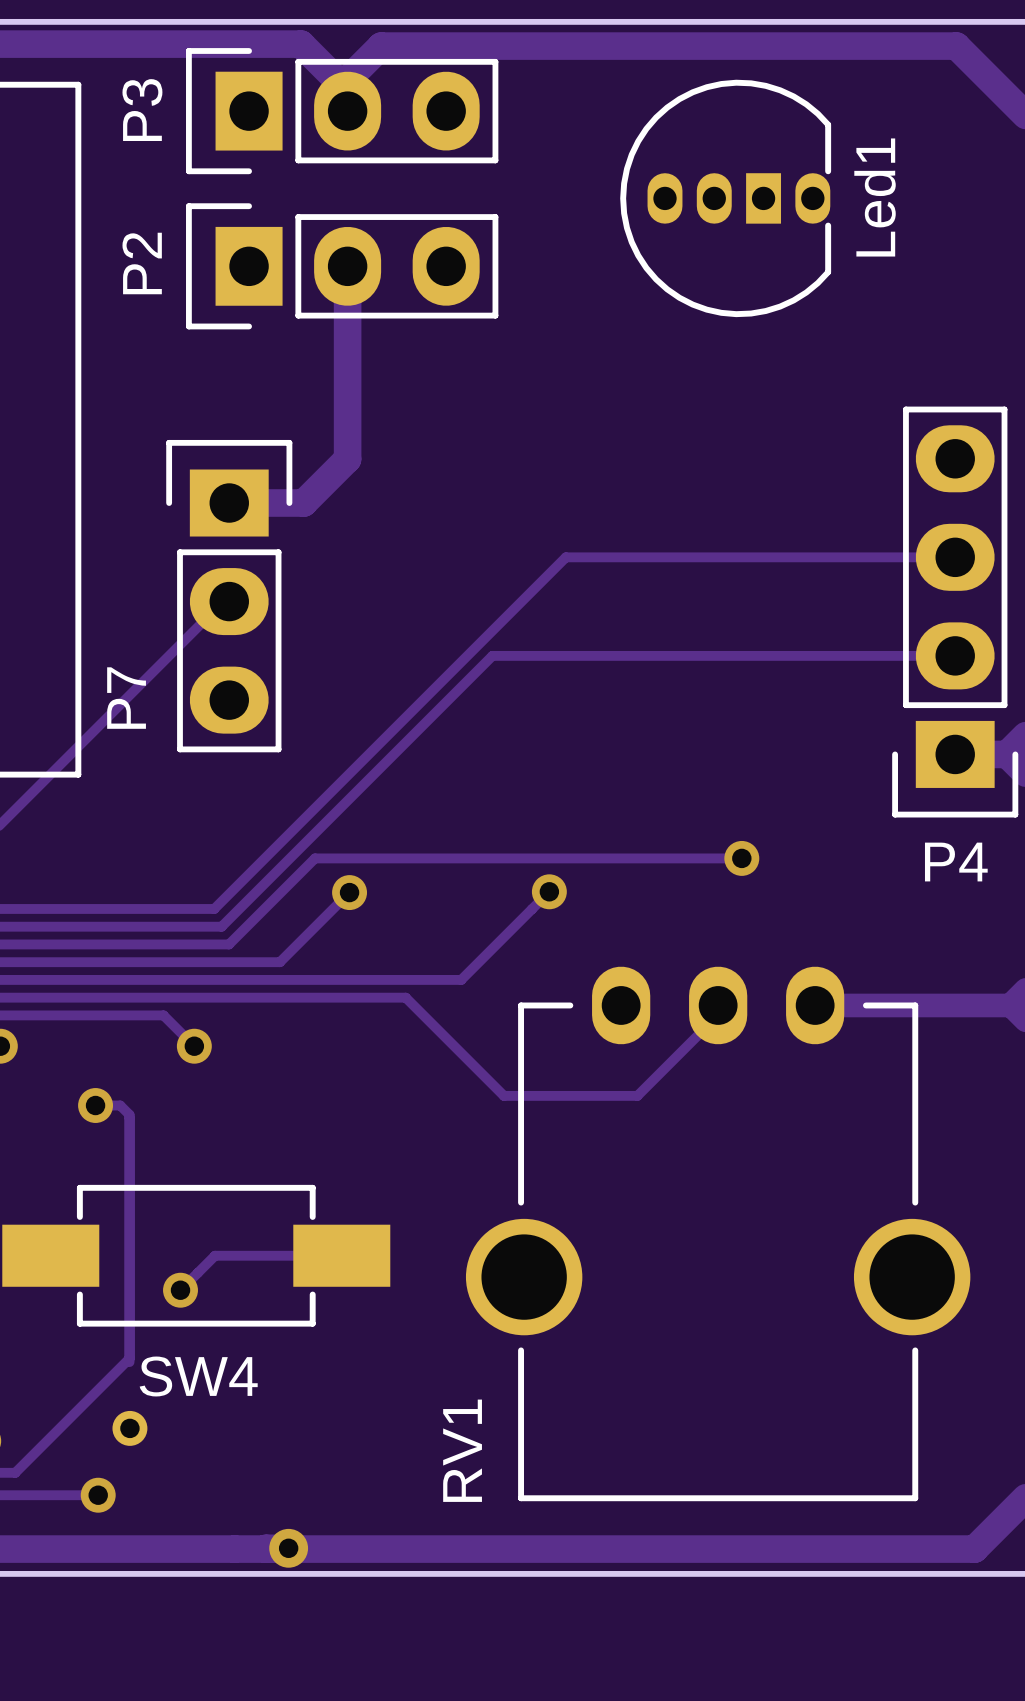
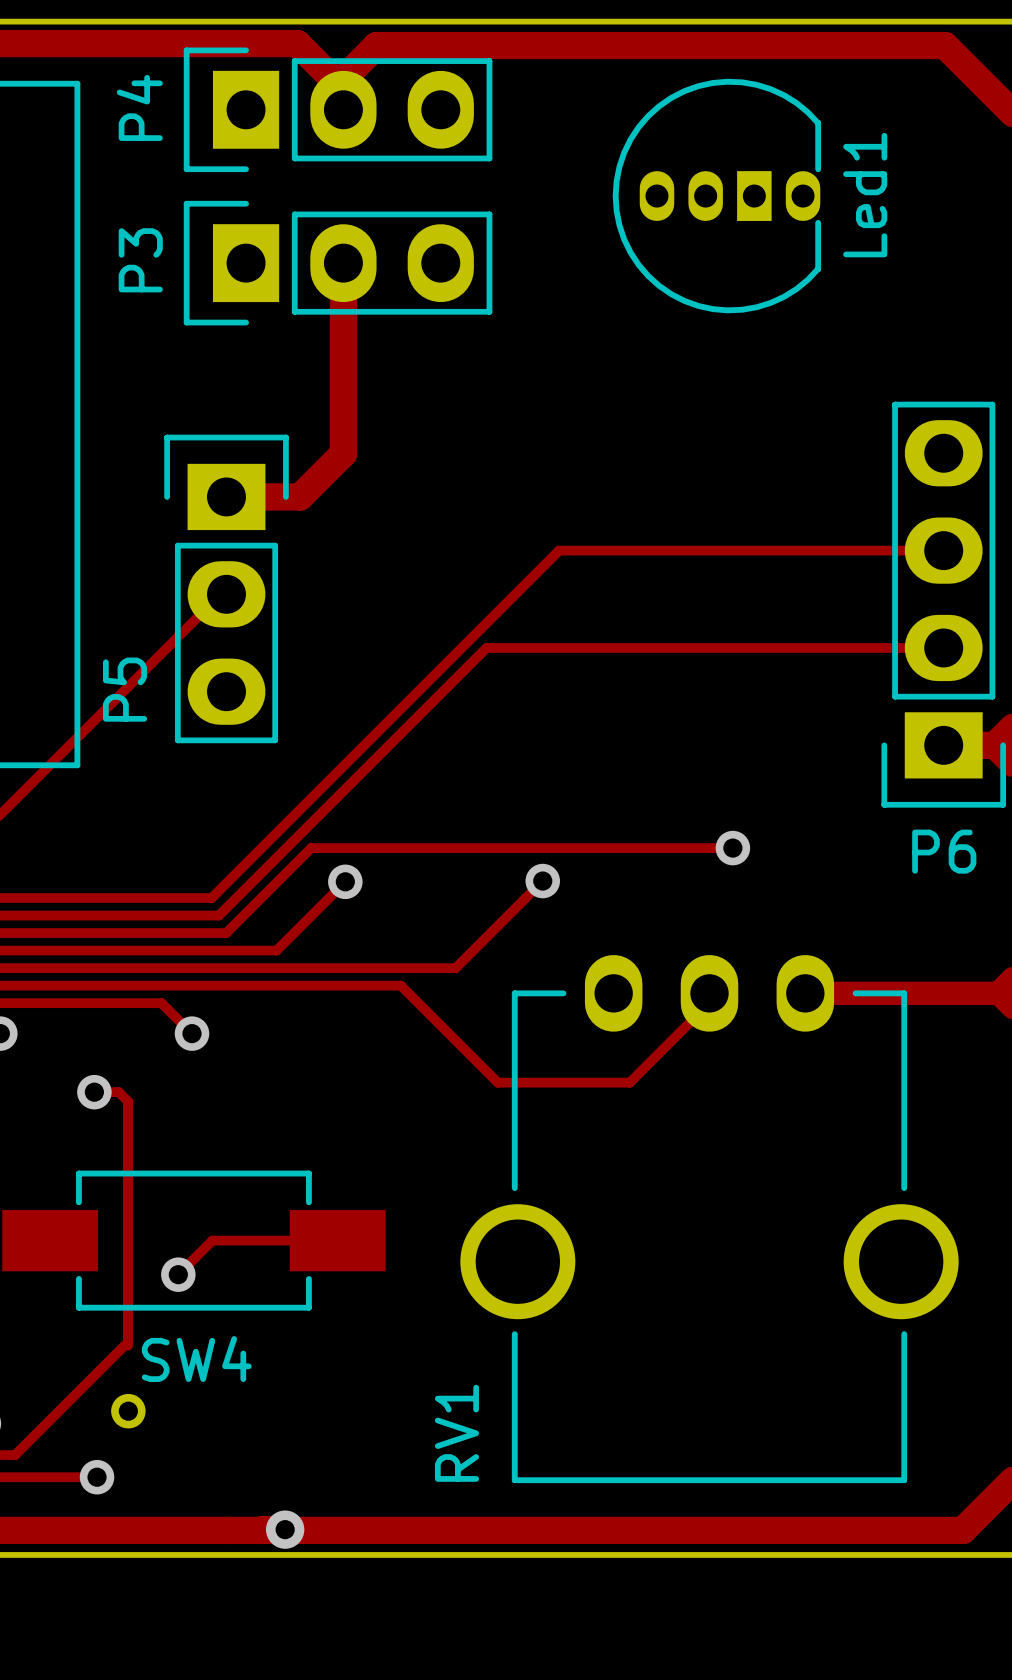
P3 name: P3 (142, 110) -> P4 (139, 107)
P2 name: P2 (142, 263) -> P3 (140, 260)
P7 name: P7 (126, 698) -> P5 (125, 689)
P4 name: P4 (956, 862) -> P6 (944, 851)

